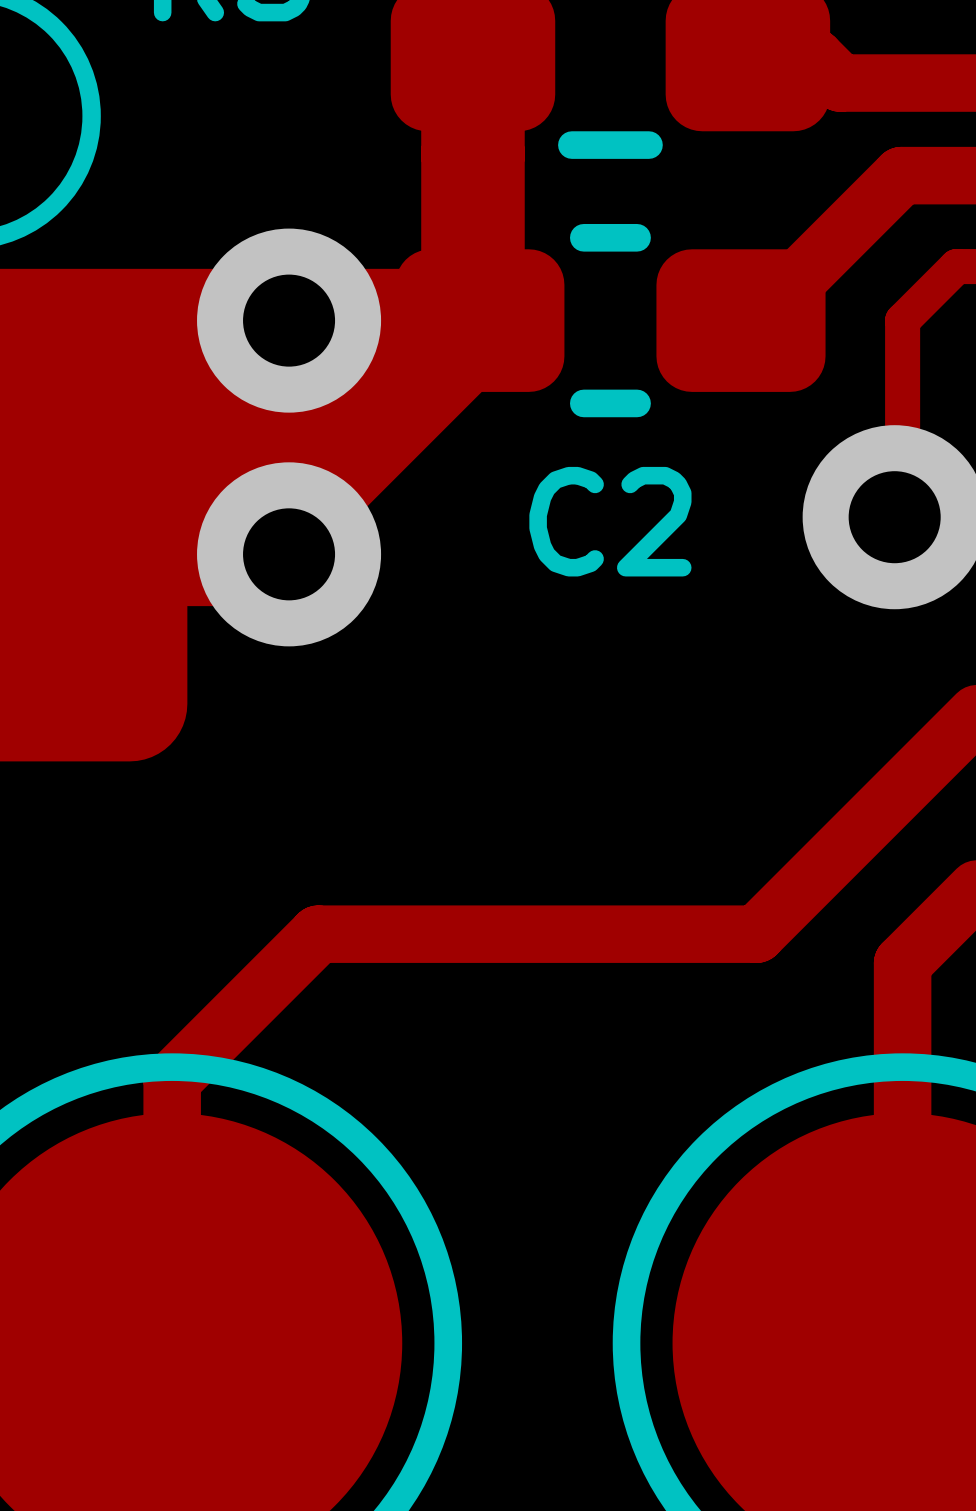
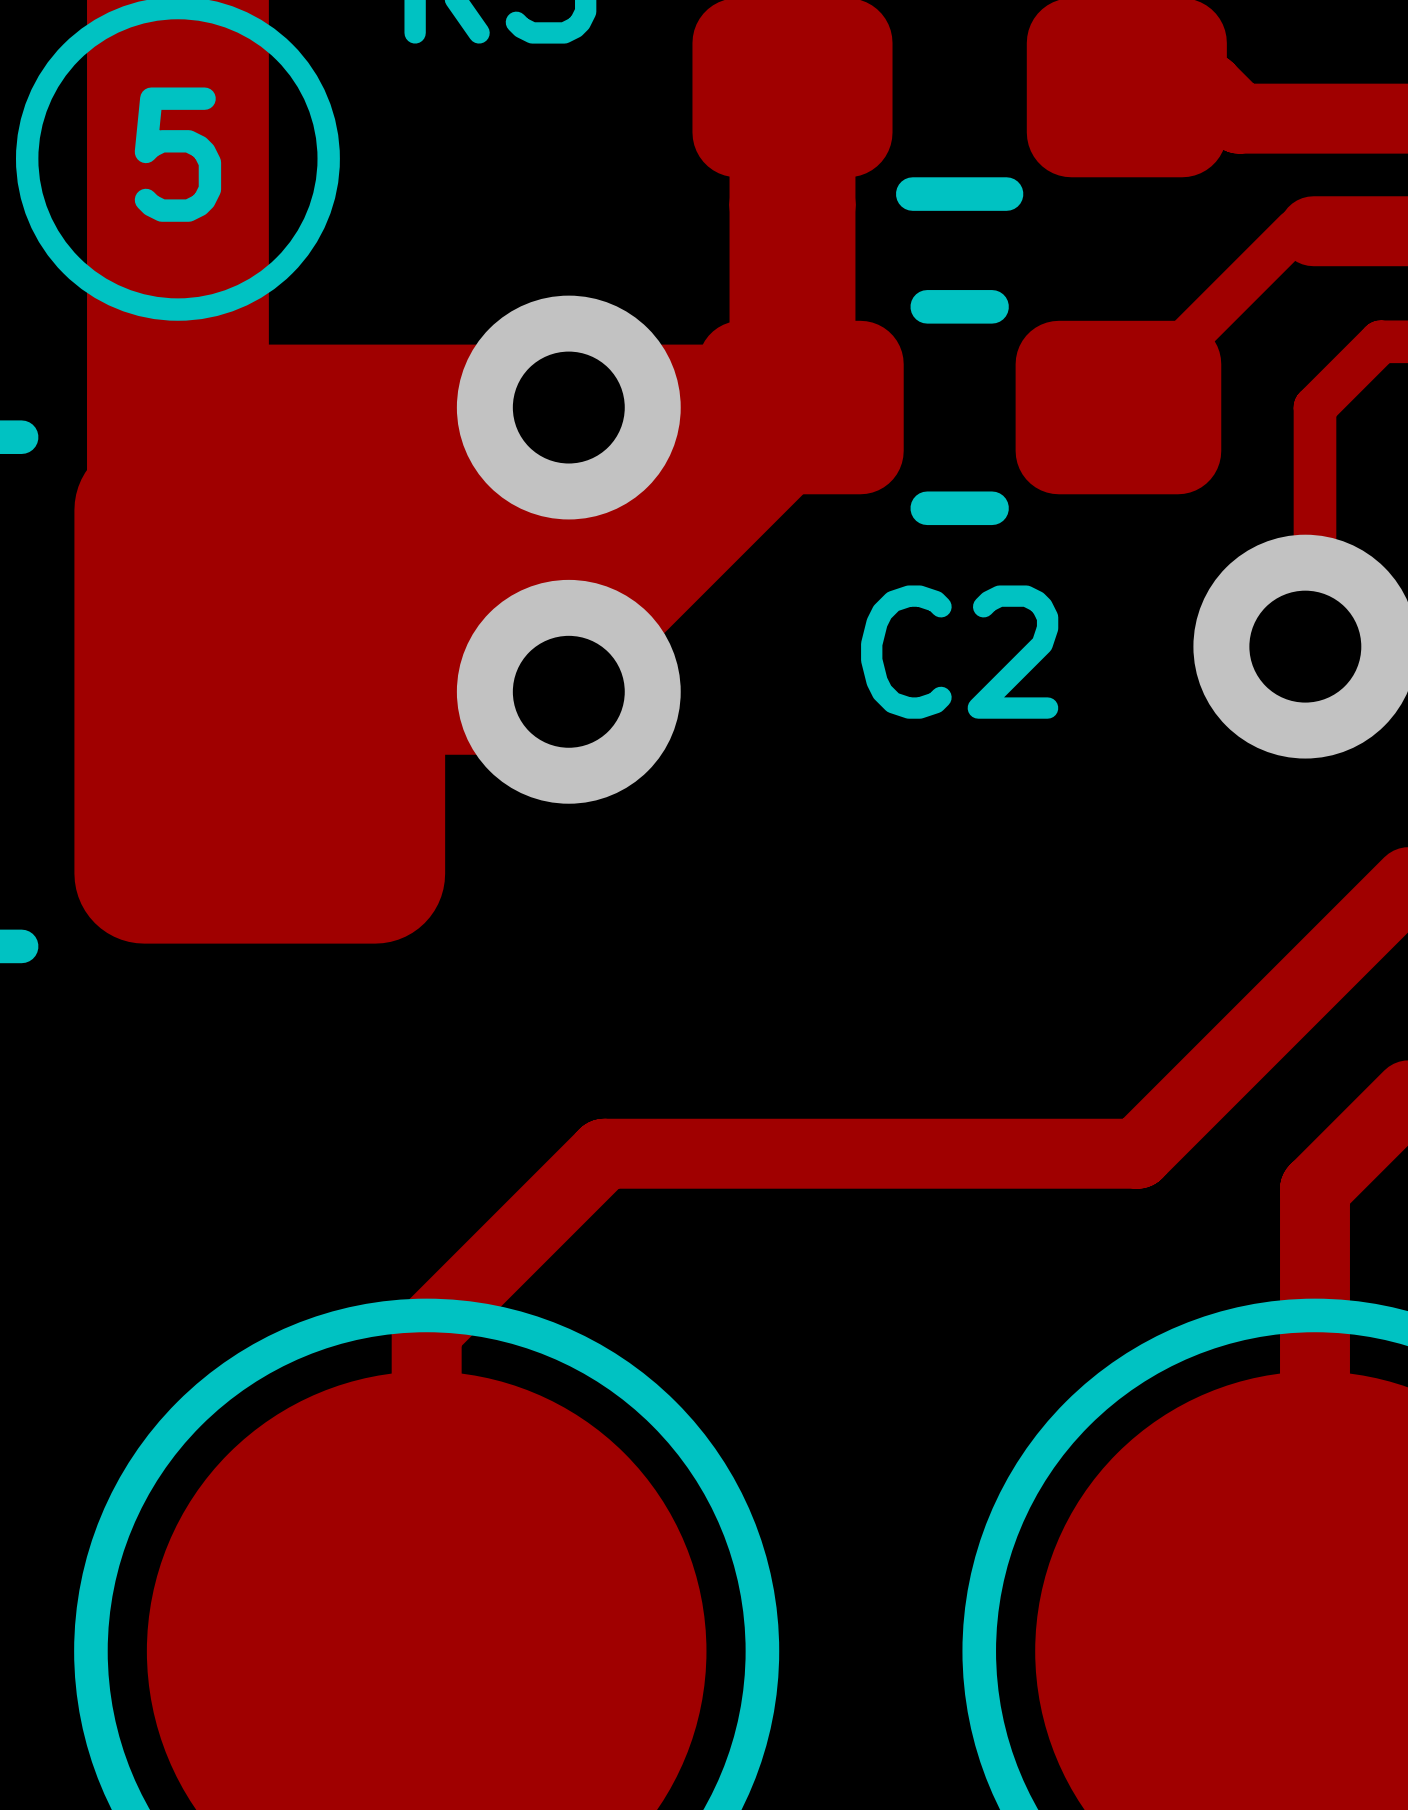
track: (901, 175) (756, 320) -> (1296, 229) (1118, 407)

